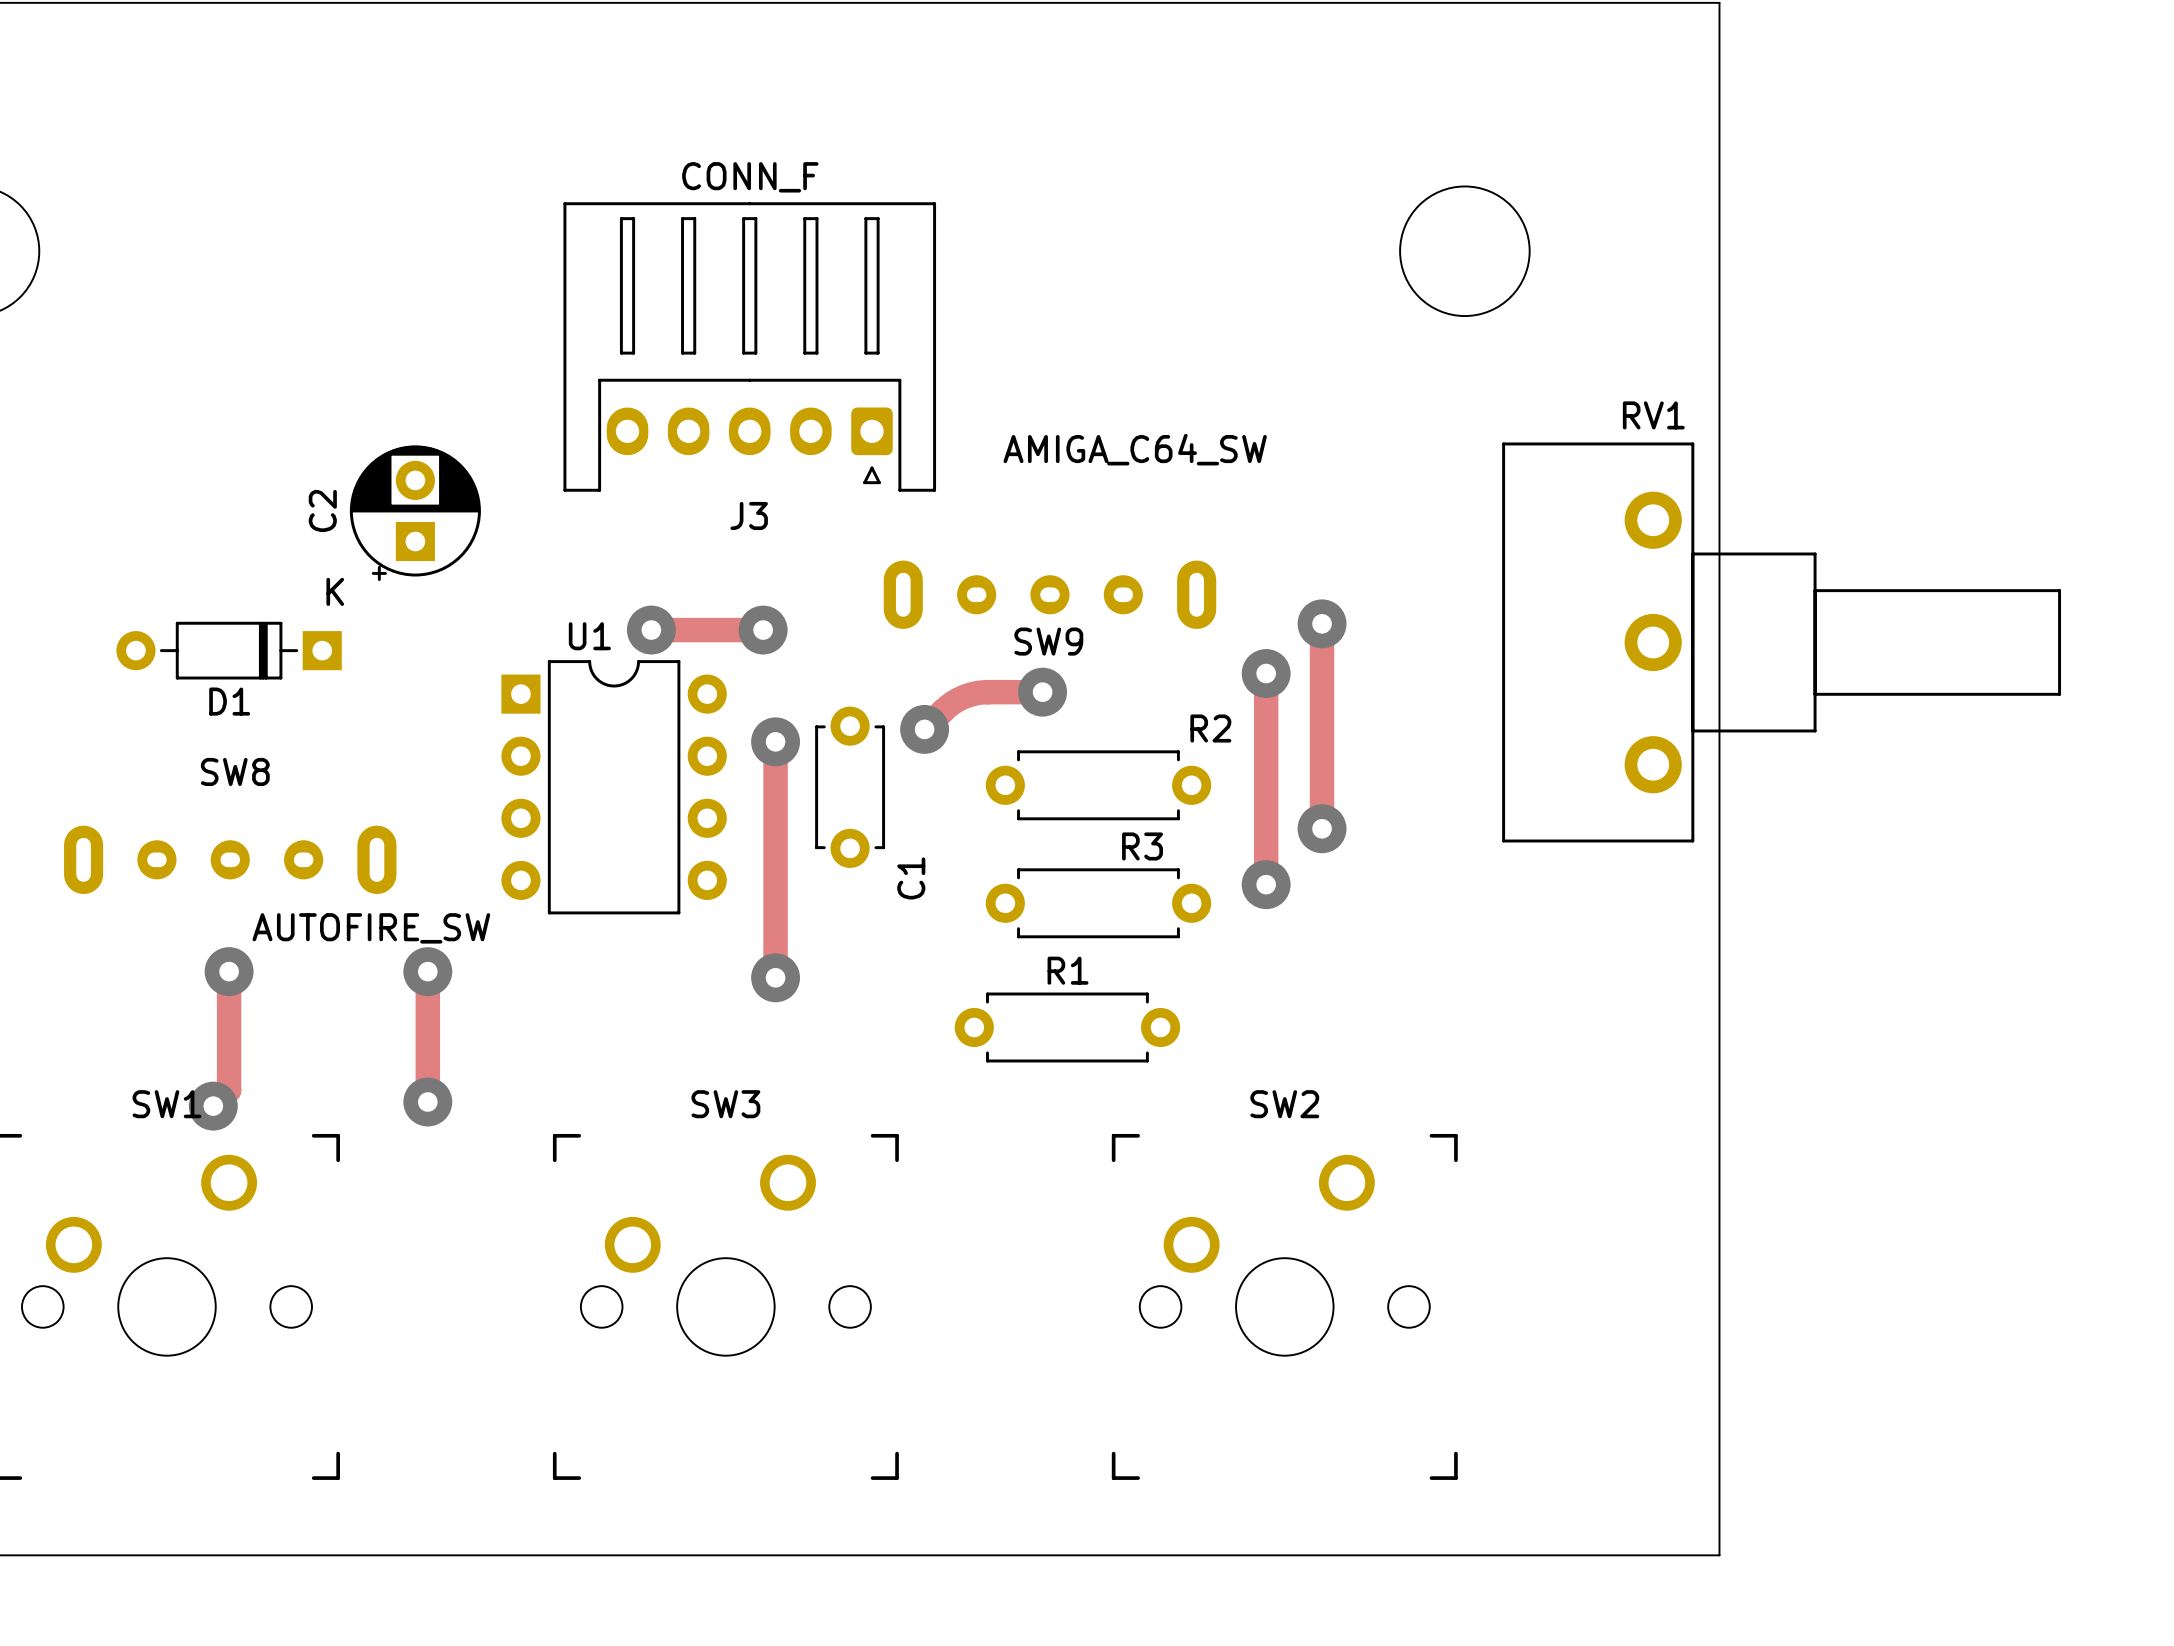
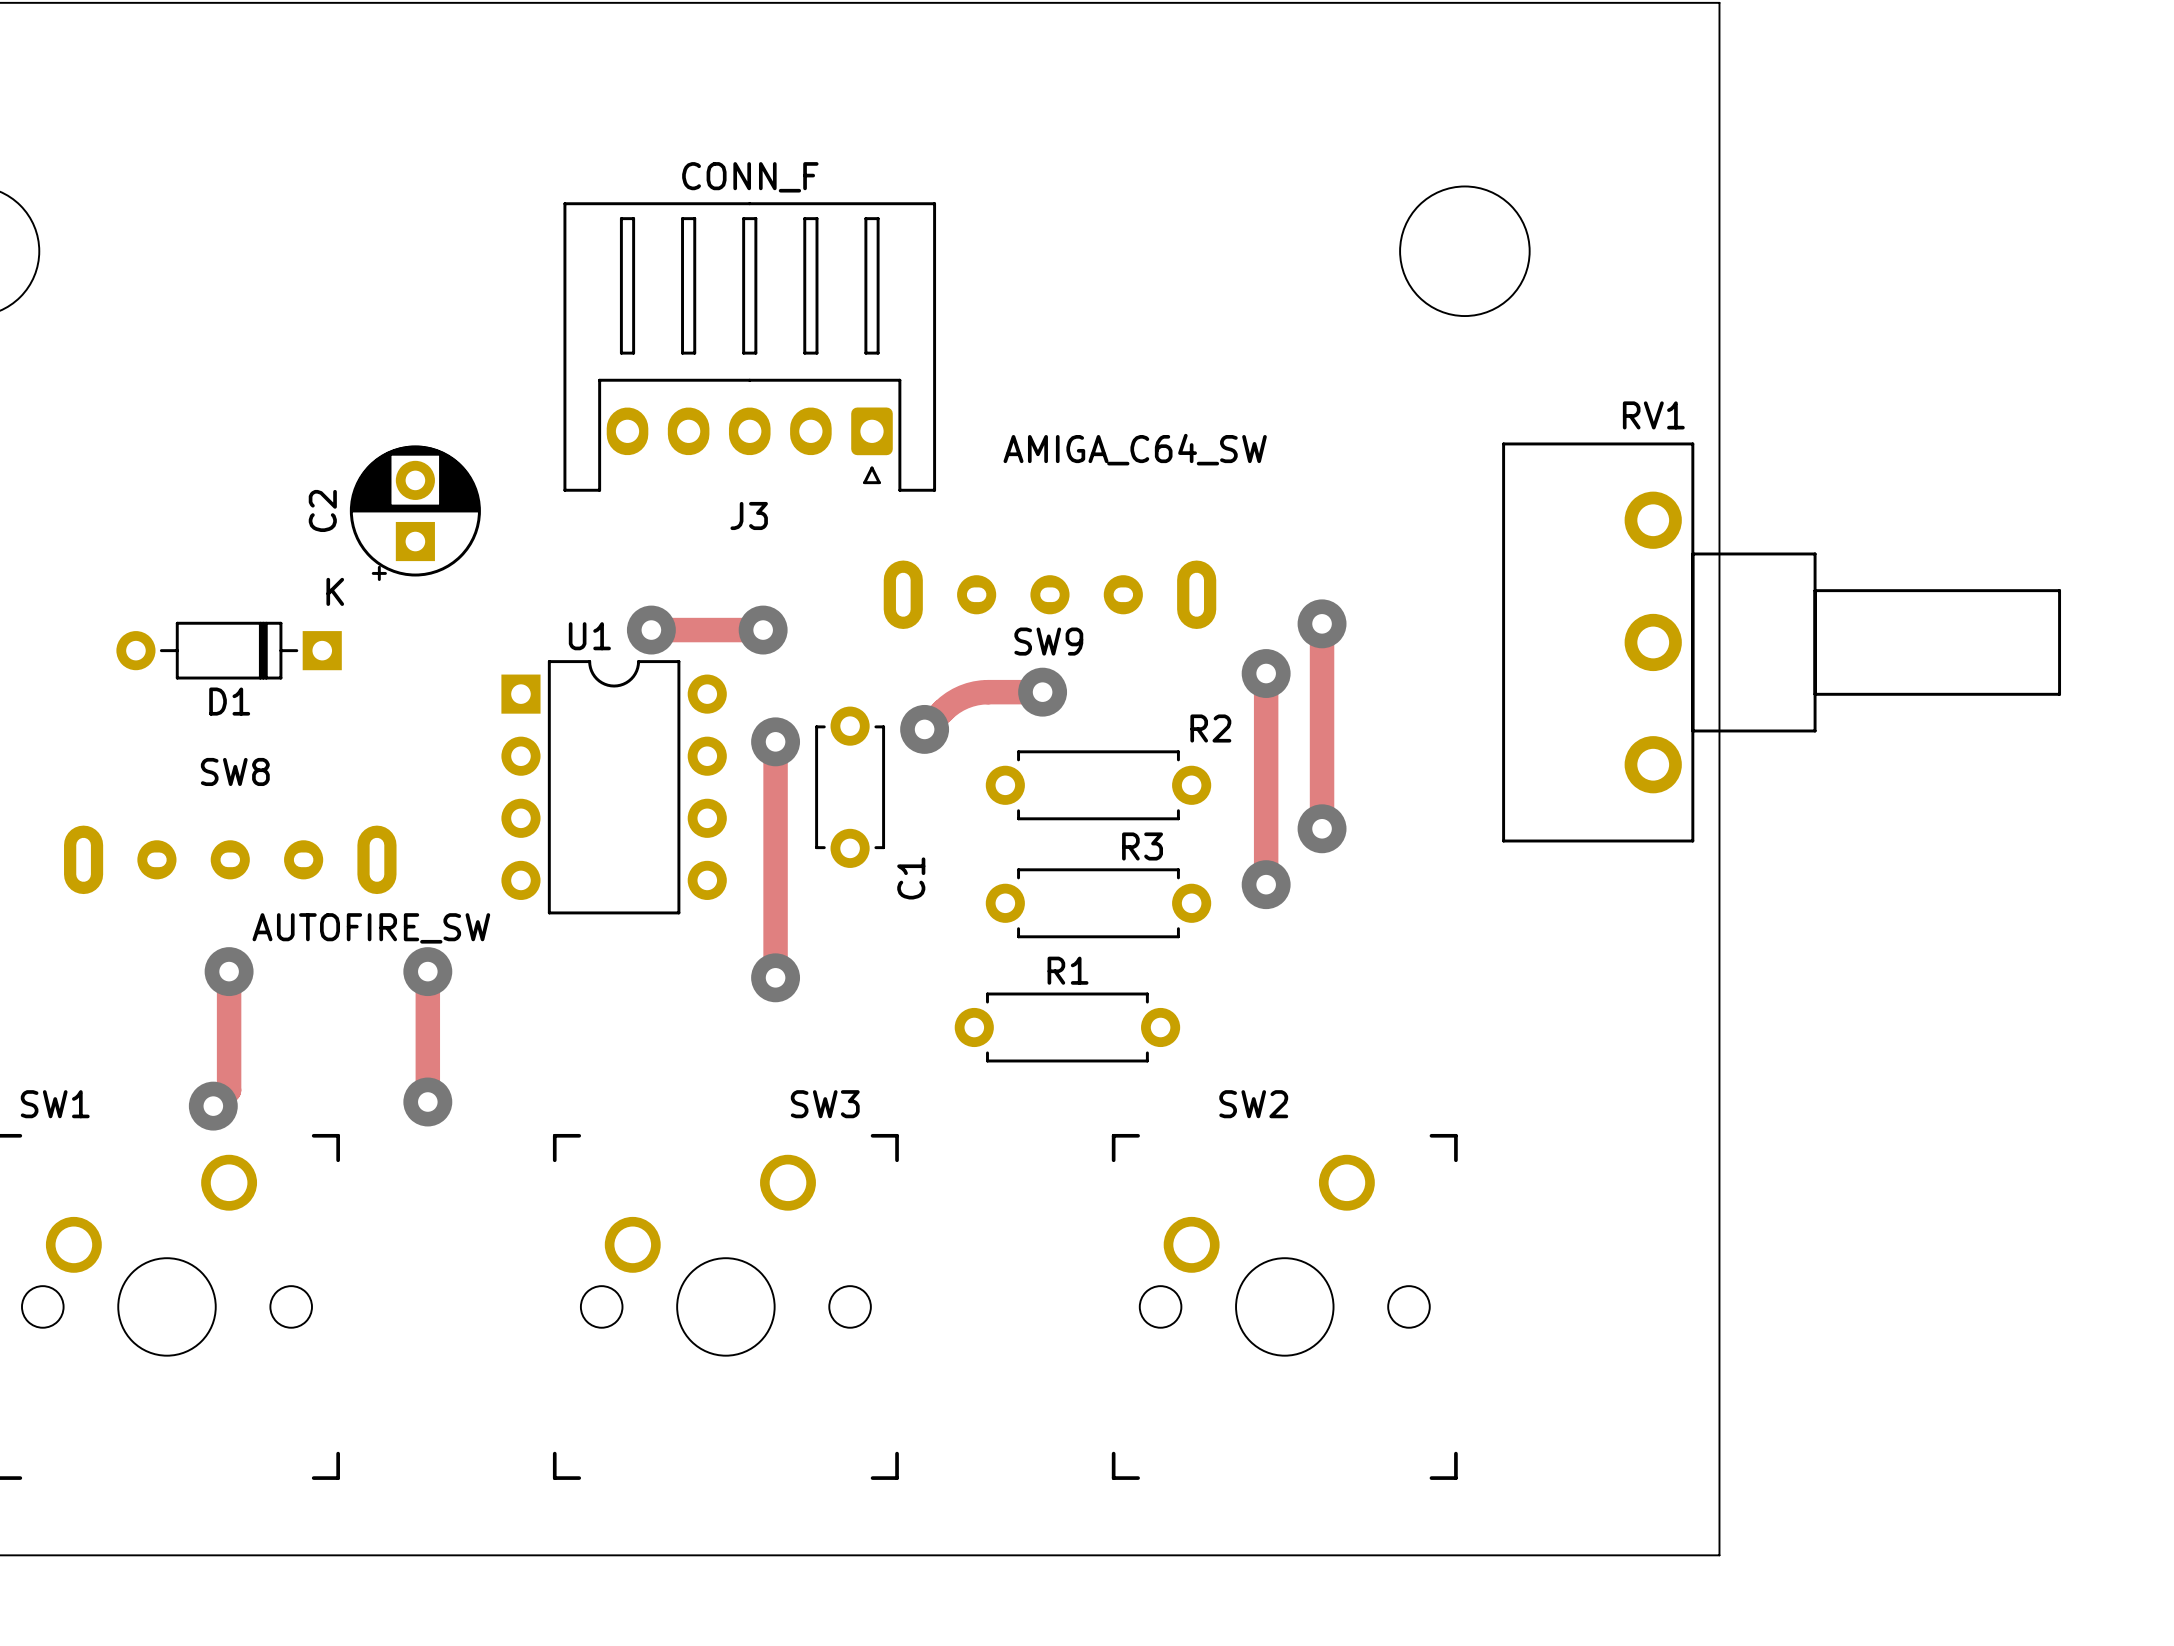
SW1 name position: SW1 (167, 1104) -> SW1 (55, 1104)
SW3 name position: SW3 (725, 1104) -> SW3 (825, 1104)
SW2 name position: SW2 (1284, 1104) -> SW2 (1253, 1104)

